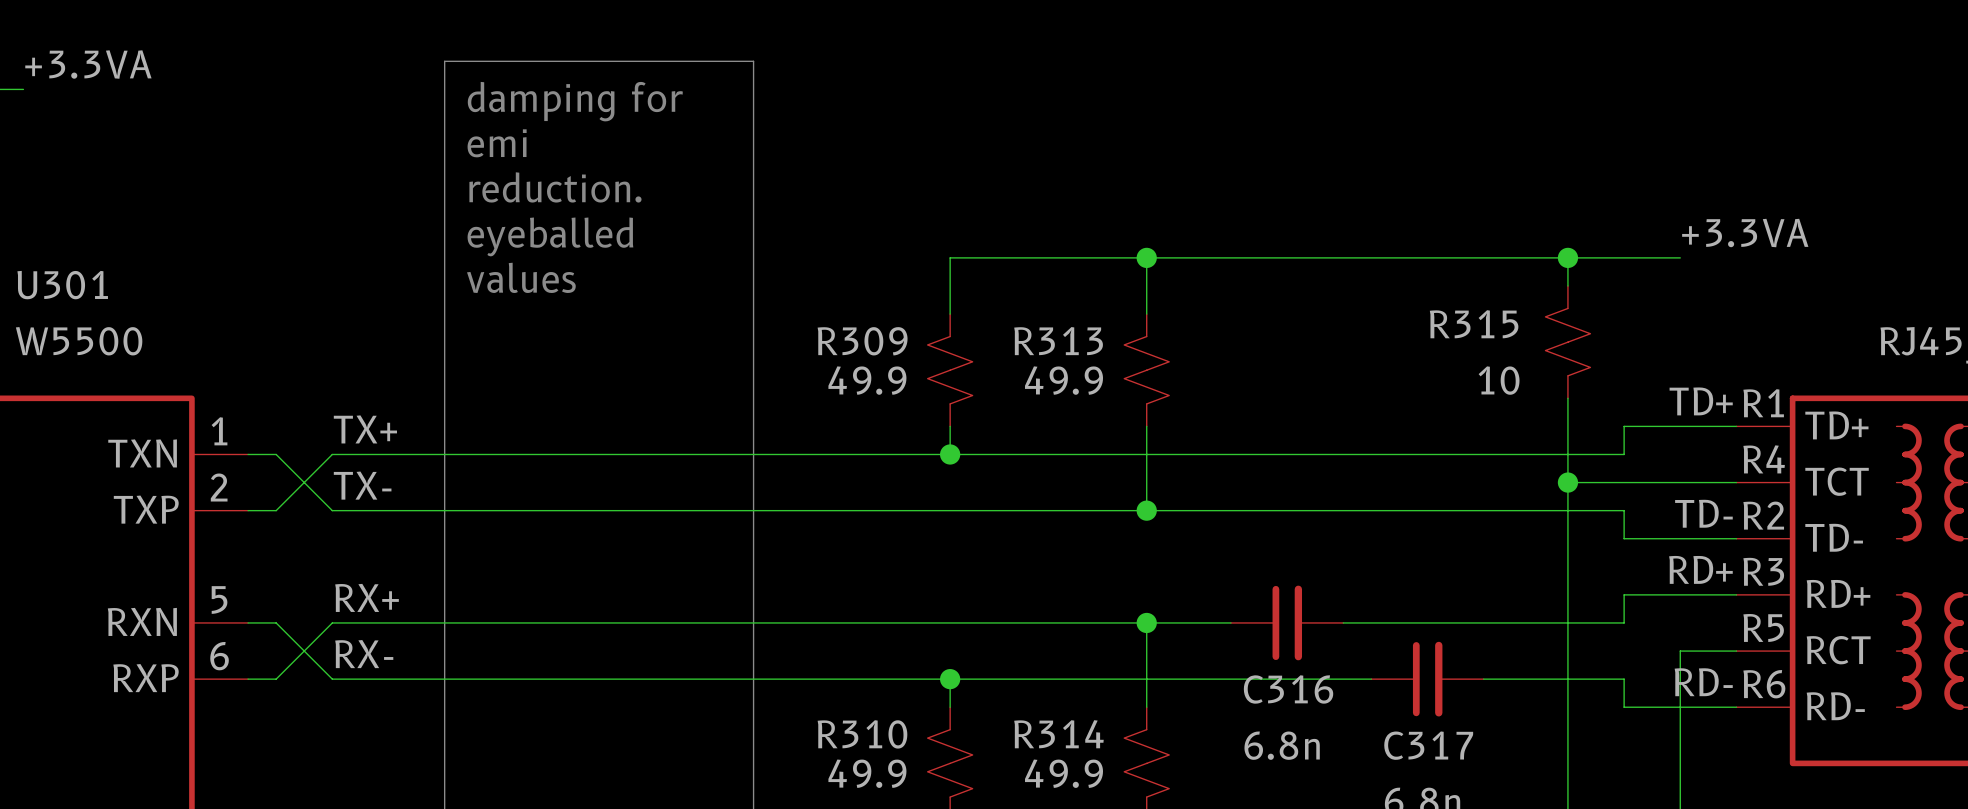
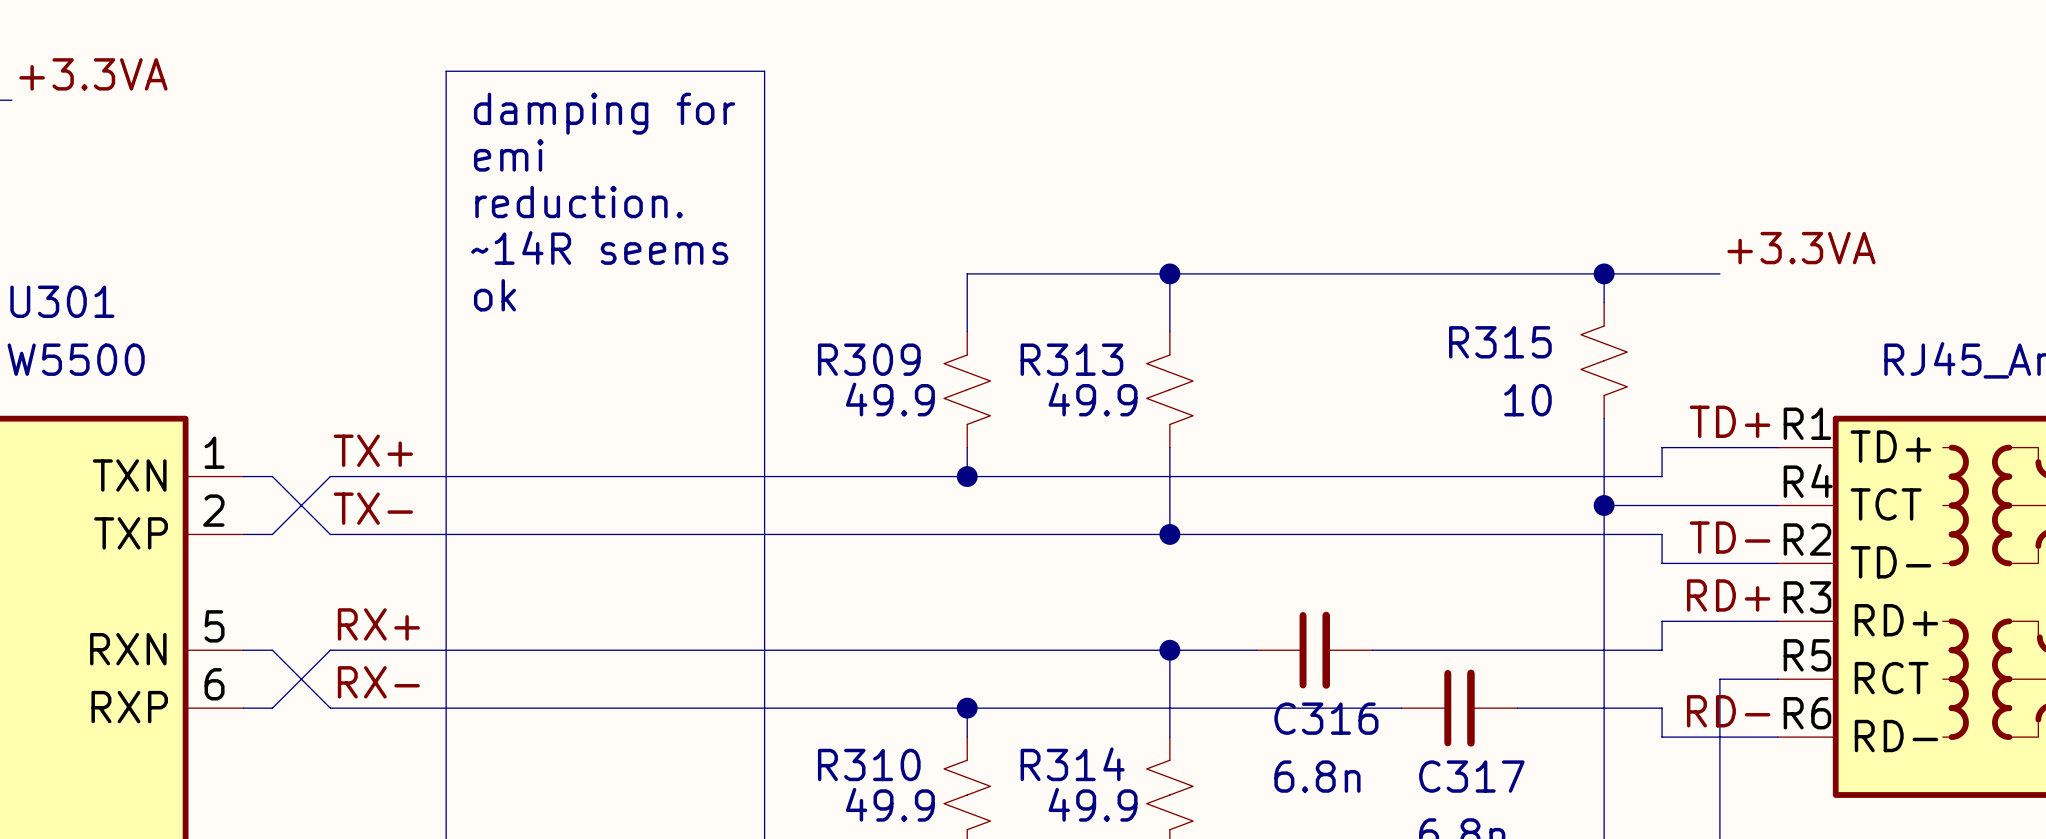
text: eyeballed (550, 236) -> ~14R seems (599, 247)
text: values (521, 277) -> ok (494, 295)

